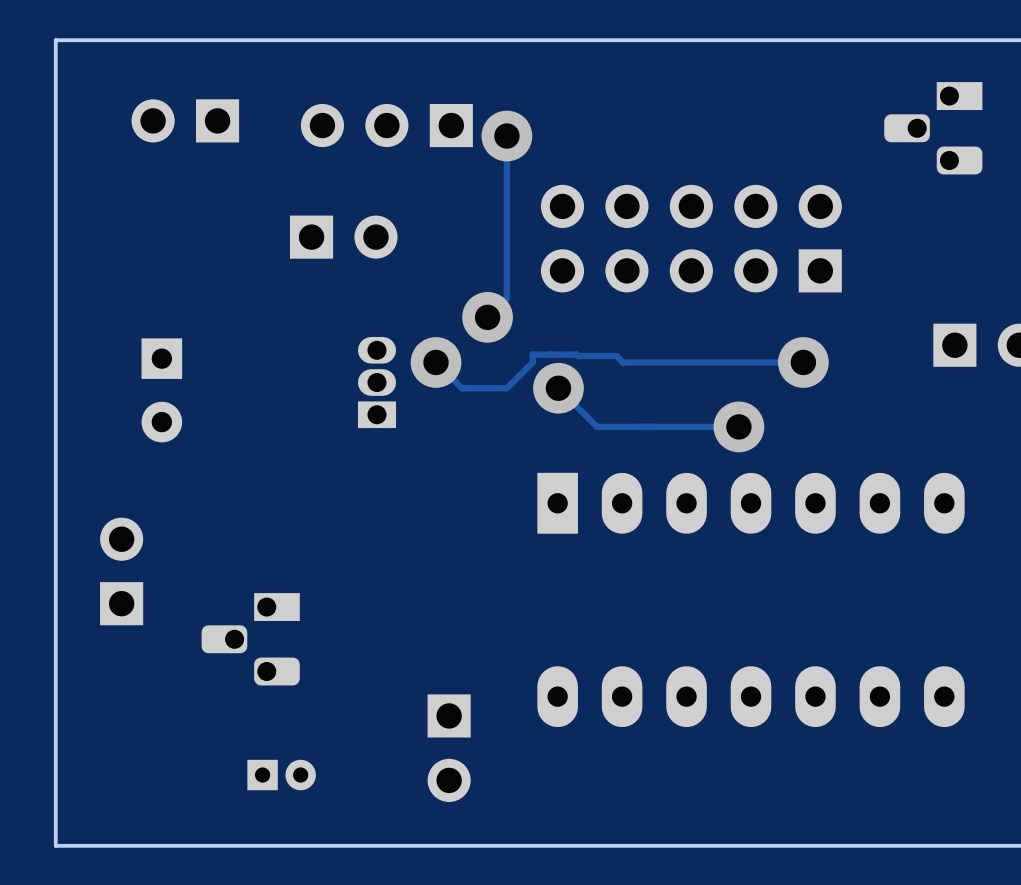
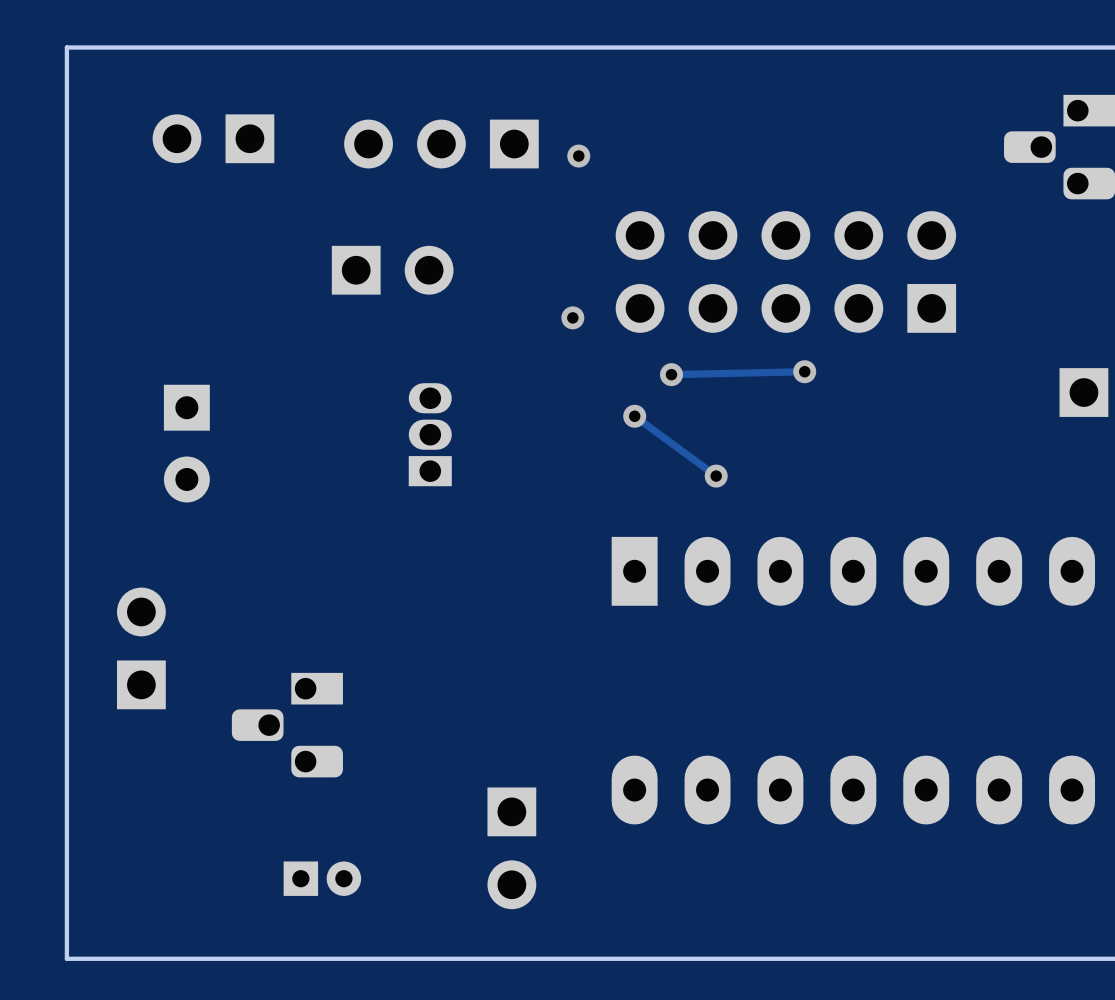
via size: [481, 110, 533, 162] -> [567, 144, 591, 168]
track: (506, 136) (506, 298) (487, 317) -> none
via: none -> (572, 317)
via: (487, 317) -> none
track: none -> (804, 371) (671, 374)
via: none -> (804, 371)
via: none -> (671, 374)
via: (436, 362) -> none
via size: [533, 362, 584, 414] -> [623, 404, 647, 428]
track: (803, 362) (622, 362) (616, 356) (532, 354) (532, 362) (506, 388) (461, 388) (436, 362) -> none
via: (803, 362) -> none
track: none -> (634, 416) (716, 476)
track: (558, 388) (597, 426) (738, 426) -> none
via: none -> (716, 476)
via: (738, 426) -> none

